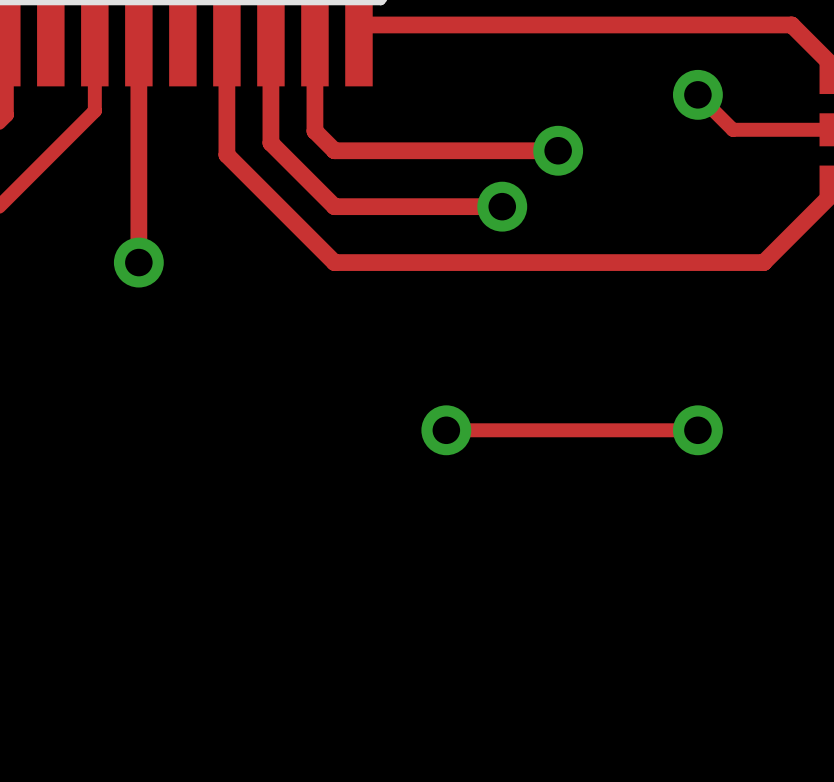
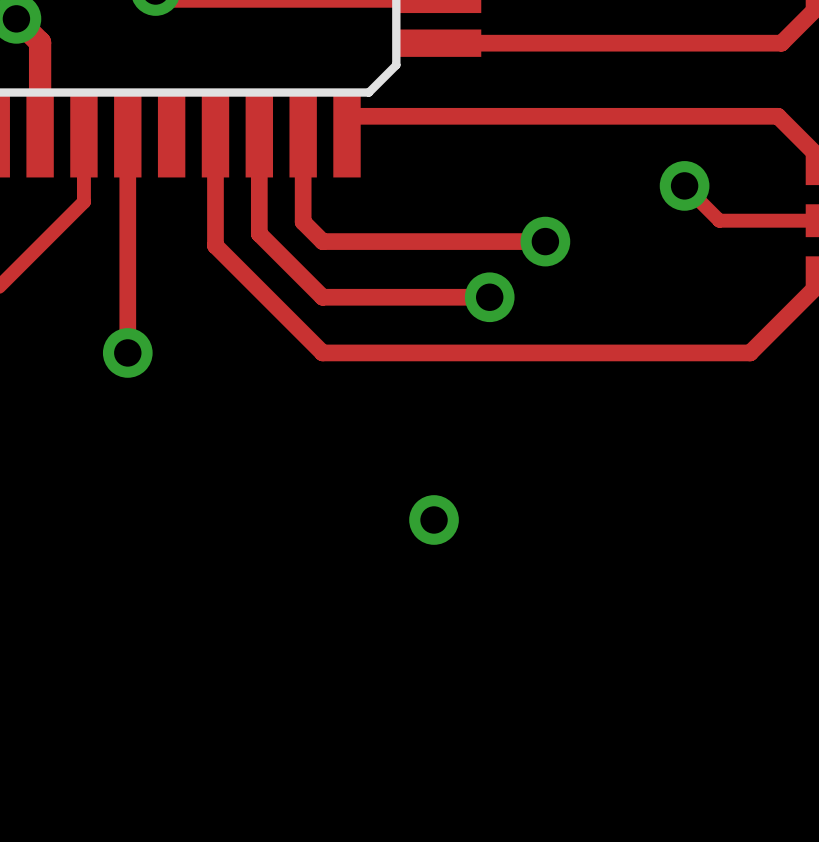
track: (446, 430) (697, 430) -> none
via: (697, 430) -> none

